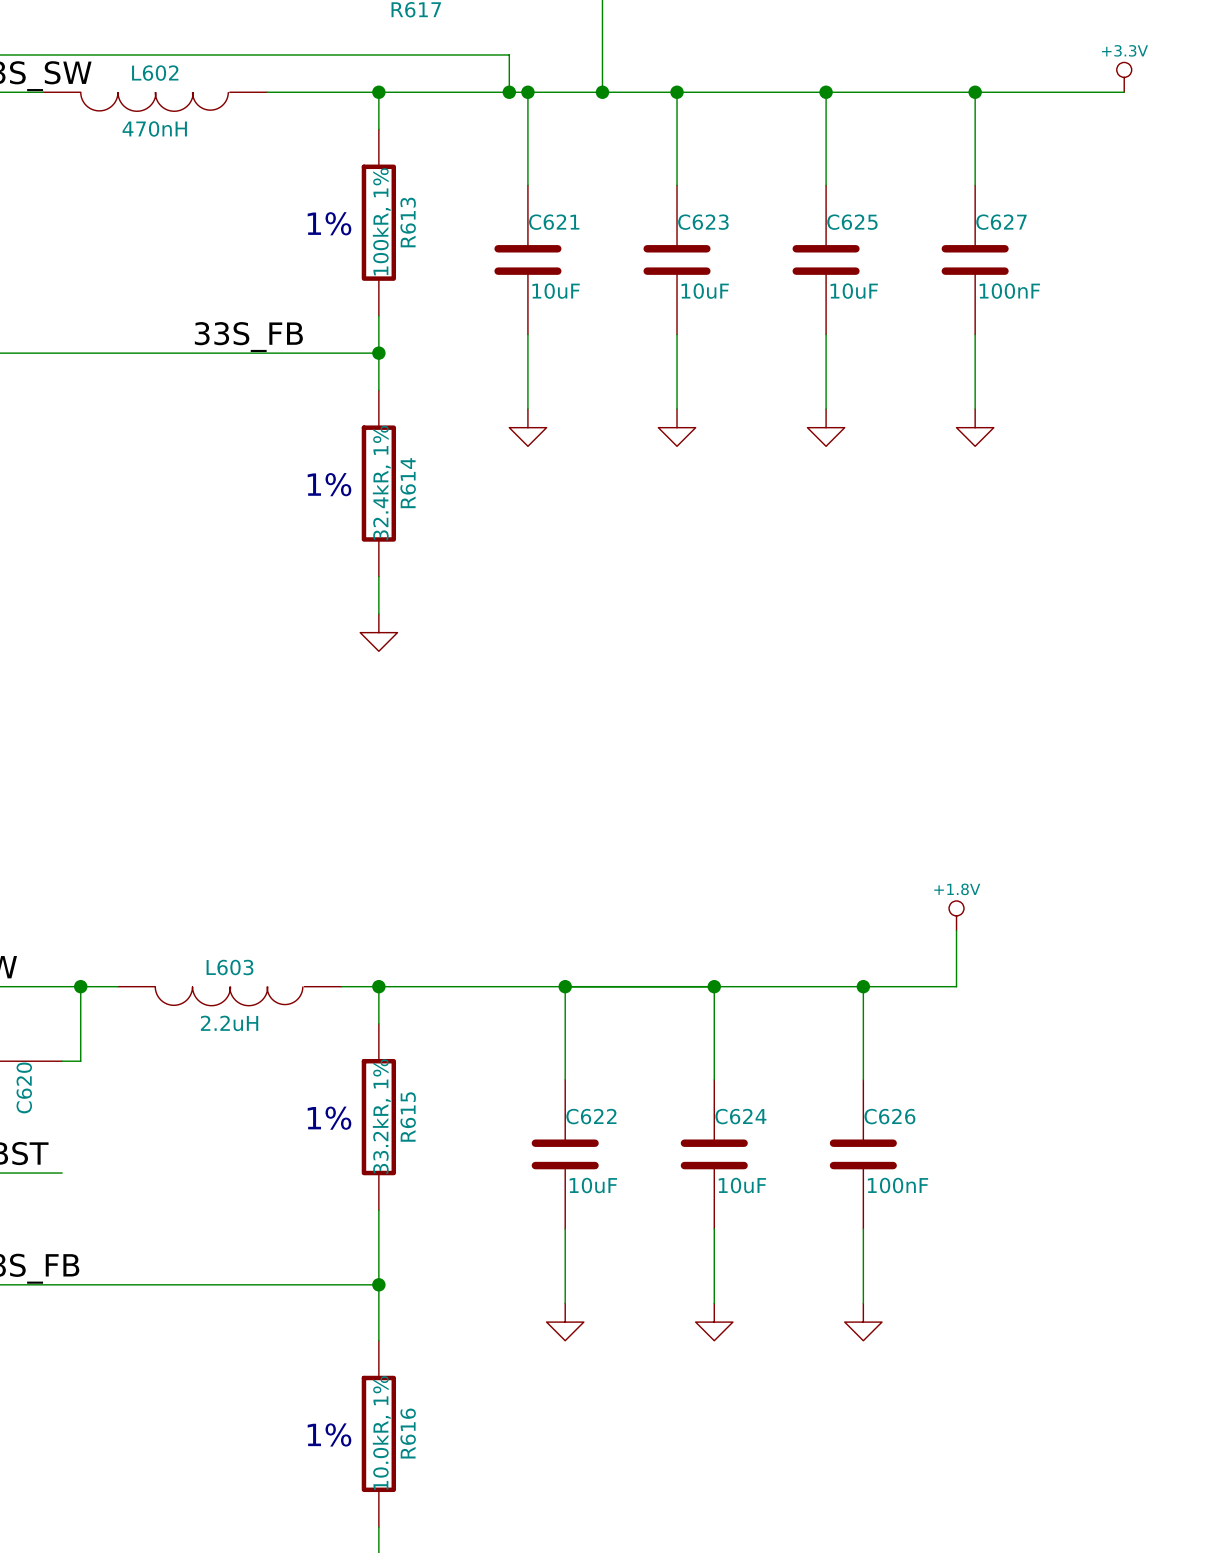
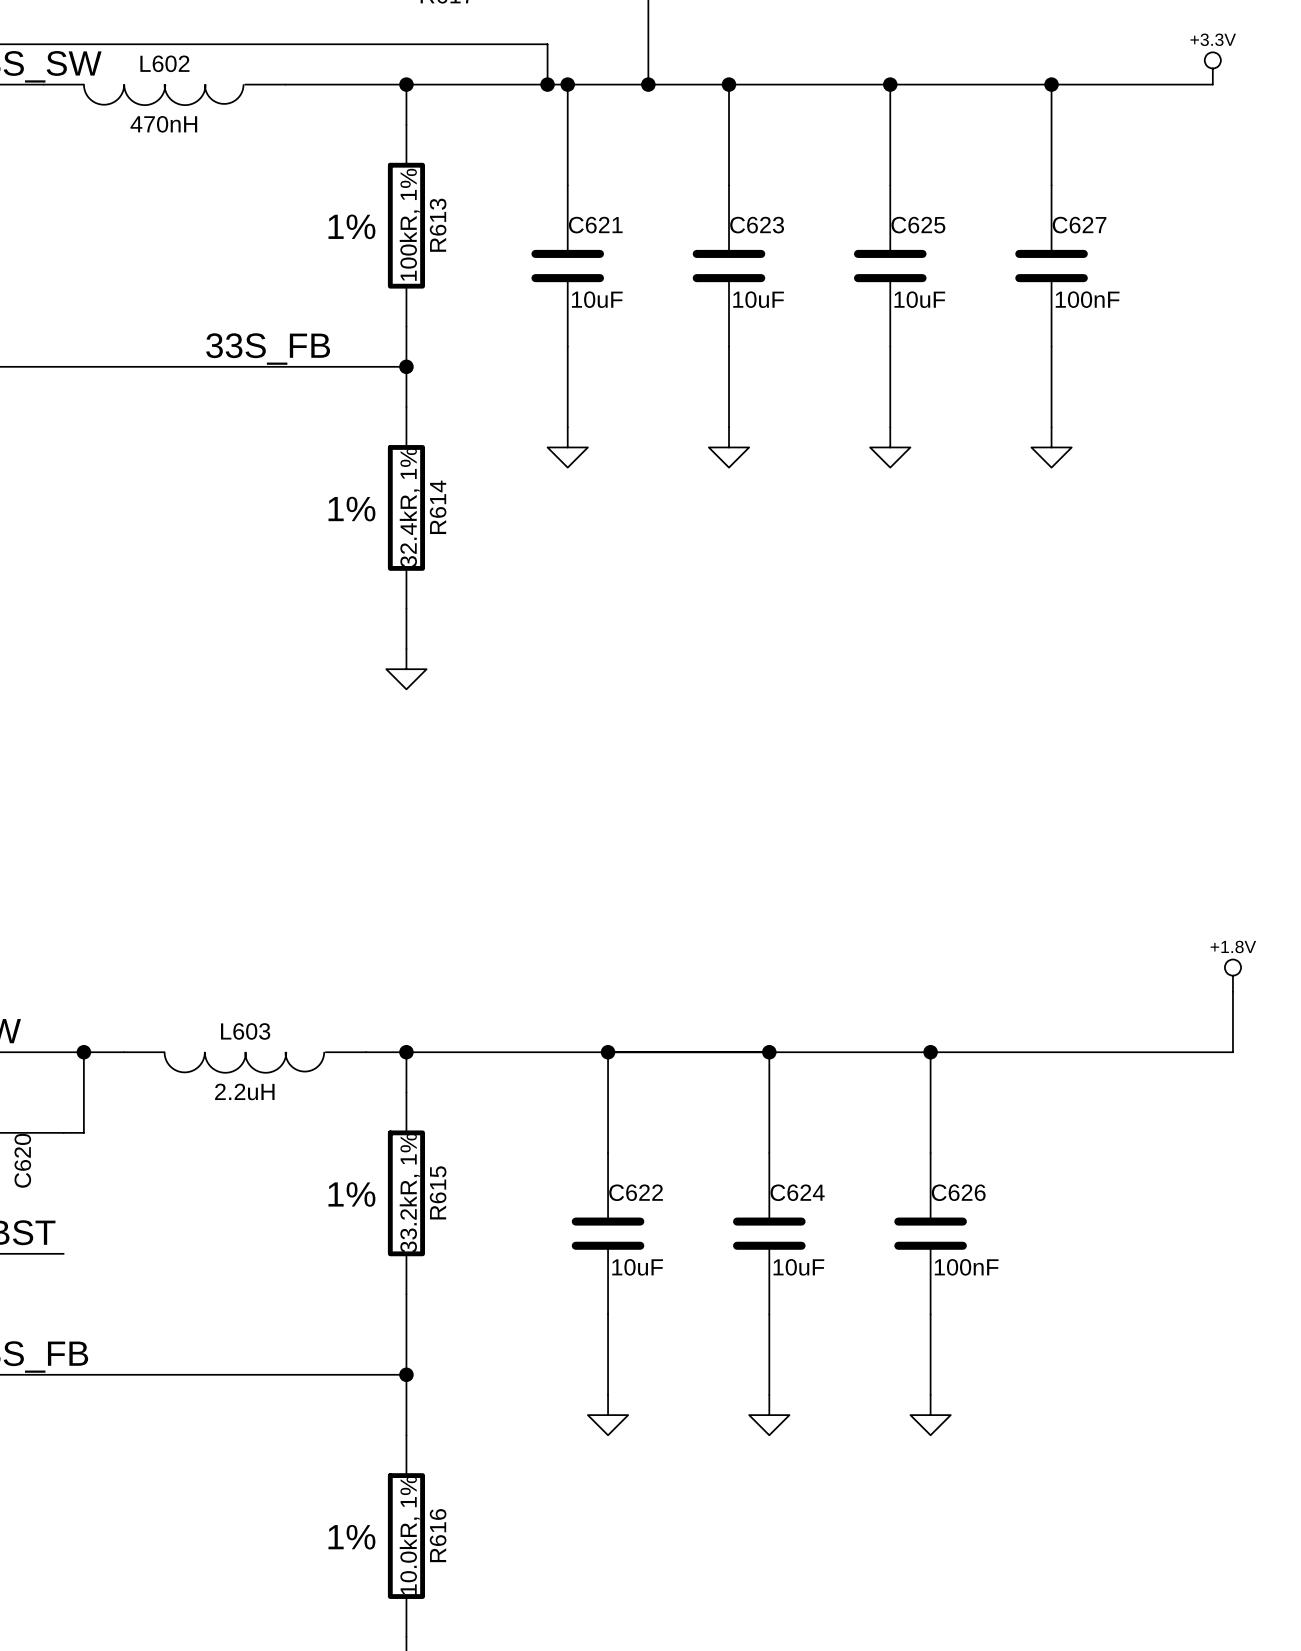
power symbol position: +1.8V (956, 915) -> +1.8V (1232, 975)
wire: (956, 930) (956, 986) -> (1232, 991) (1232, 1052) (1031, 1052)

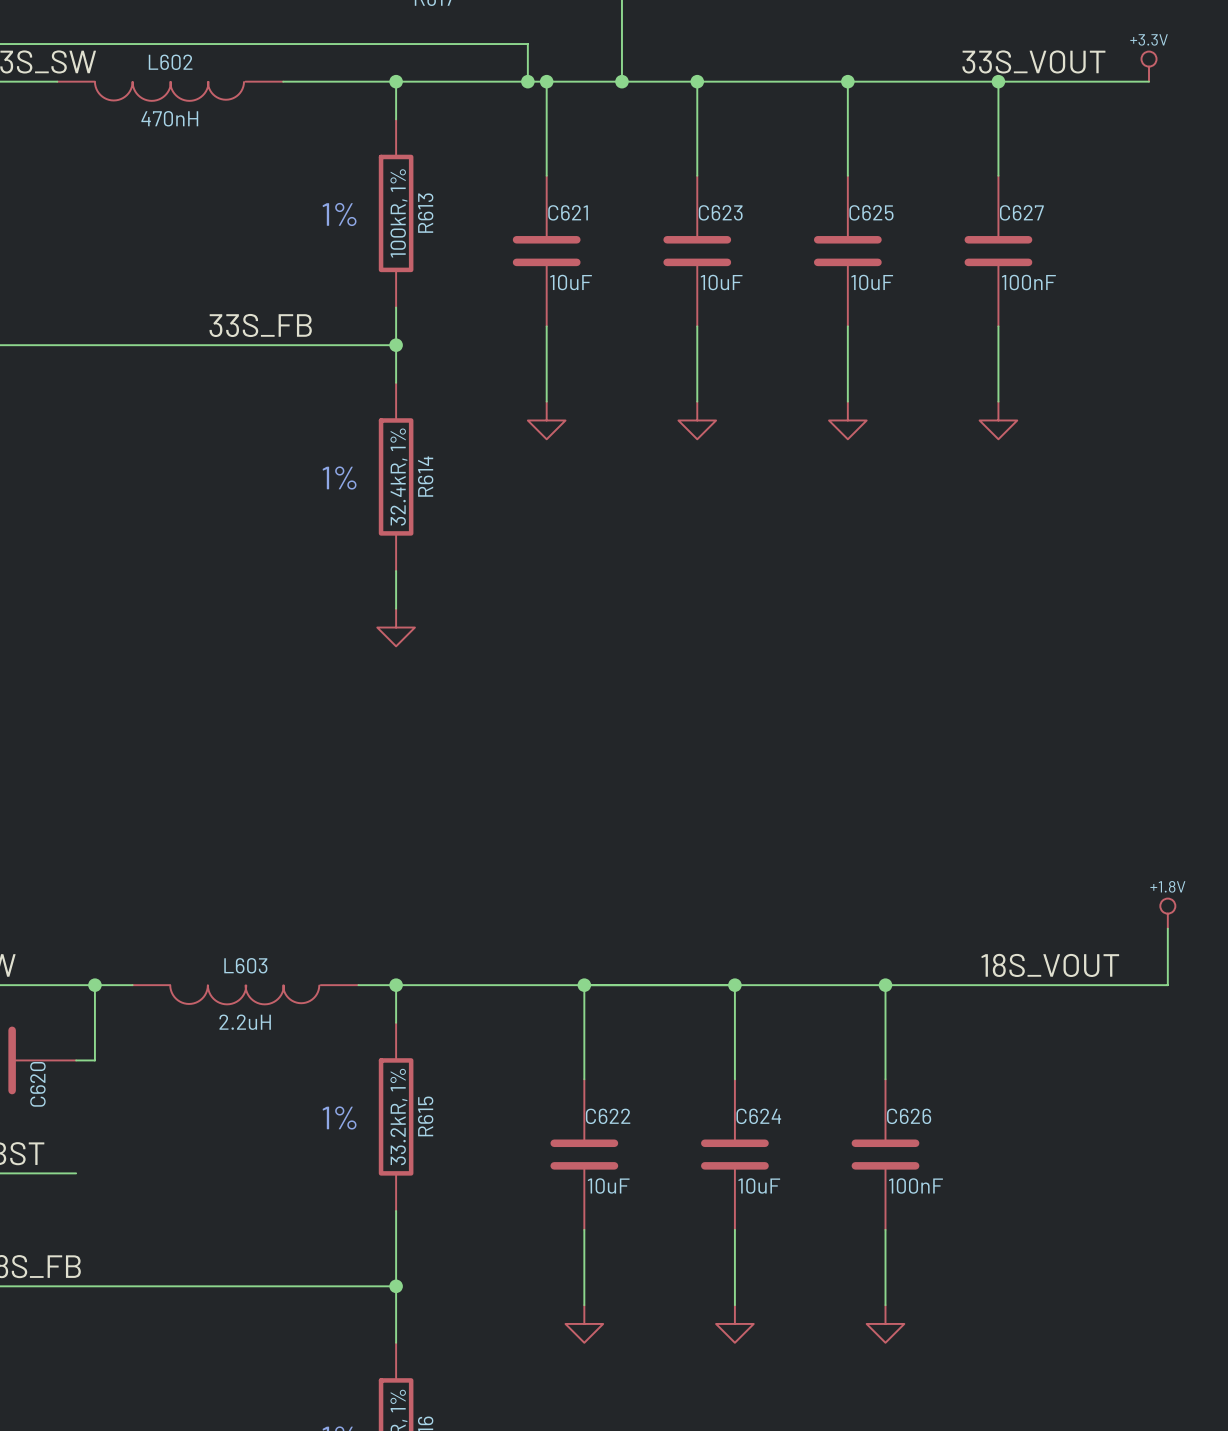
label: none -> 33S_VOUT (1033, 61)
label: none -> 18S_VOUT (1050, 965)

